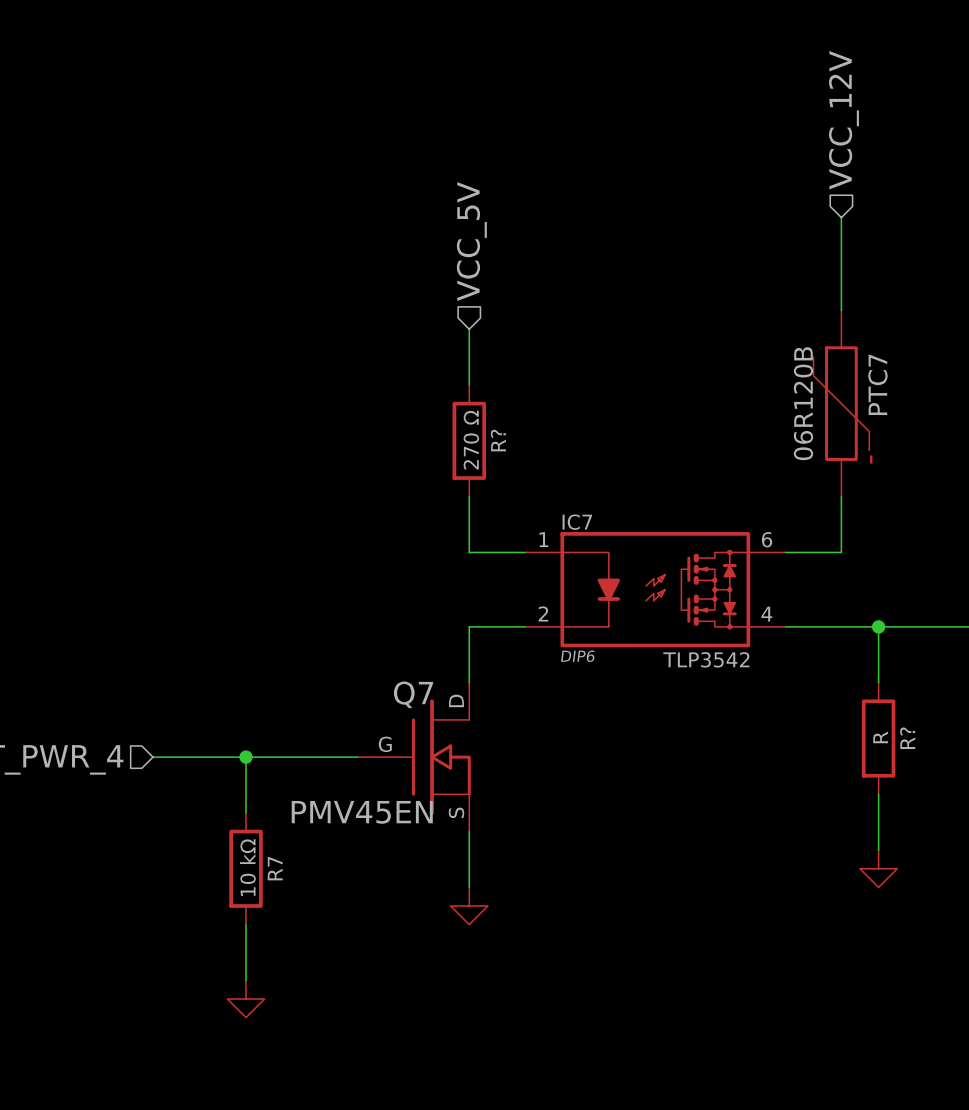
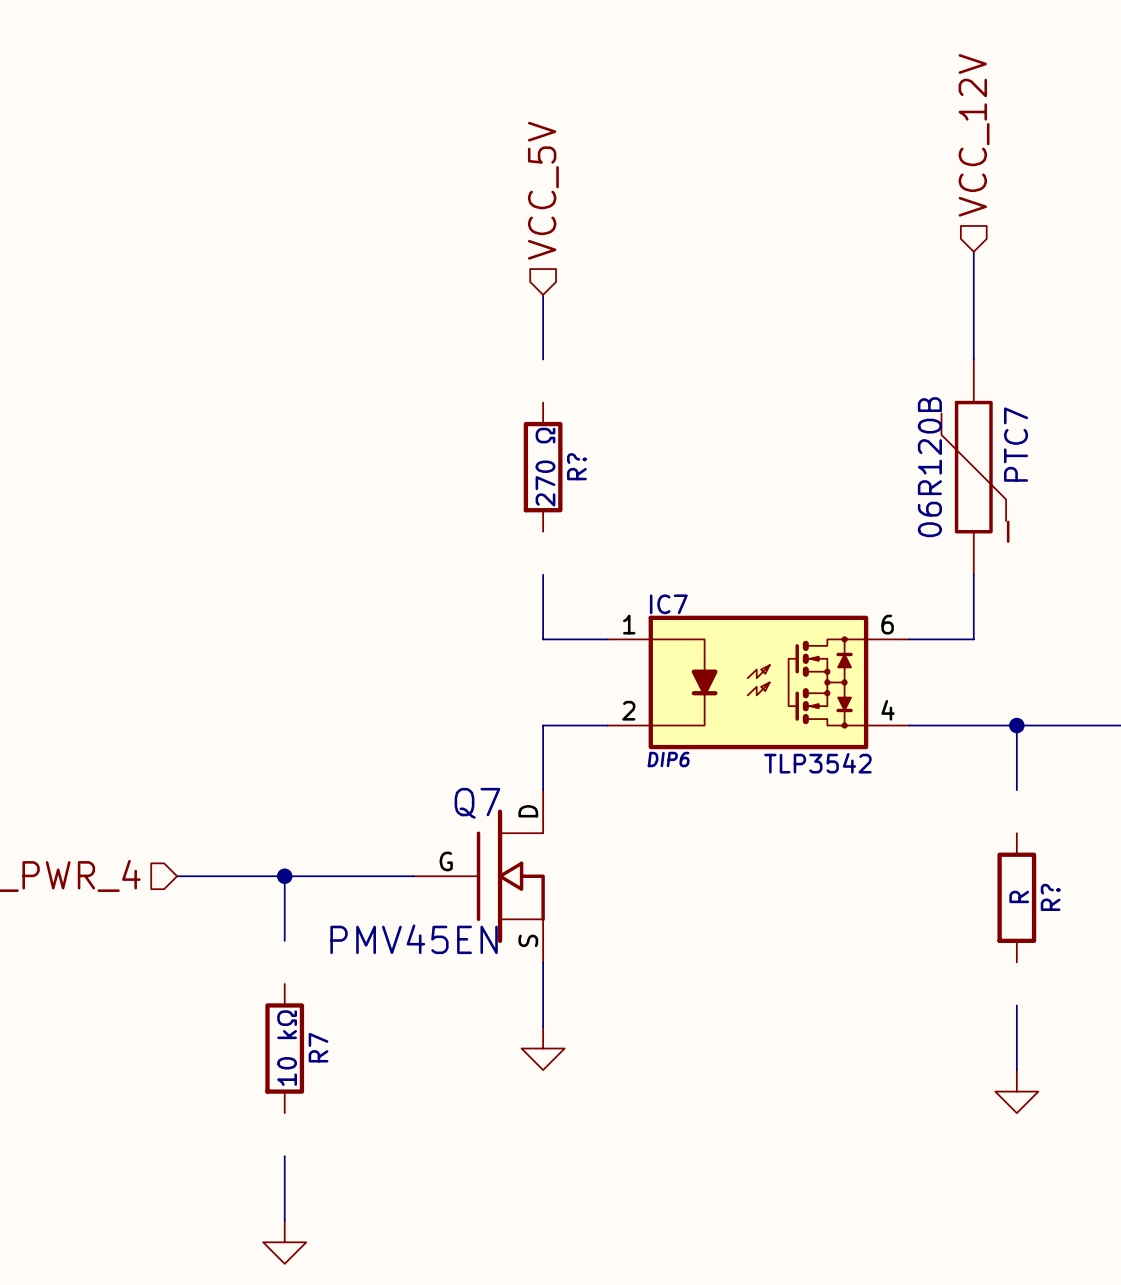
hierarchical label position: VCC_5V (471, 241) -> VCC_5V (543, 190)
wire: (469, 329) (469, 385) -> (543, 294) (543, 359)
R? position: (469, 440) -> (543, 467)
R? position: (878, 738) -> (1016, 897)
wire: (878, 794) (878, 850) -> (1016, 1005) (1016, 1070)
R7 position: (246, 868) -> (284, 1048)
power symbol position: (878, 868) -> (1016, 1091)
wire: (246, 924) (246, 980) -> (284, 1156) (284, 1220)
power symbol position: (246, 999) -> (284, 1242)

